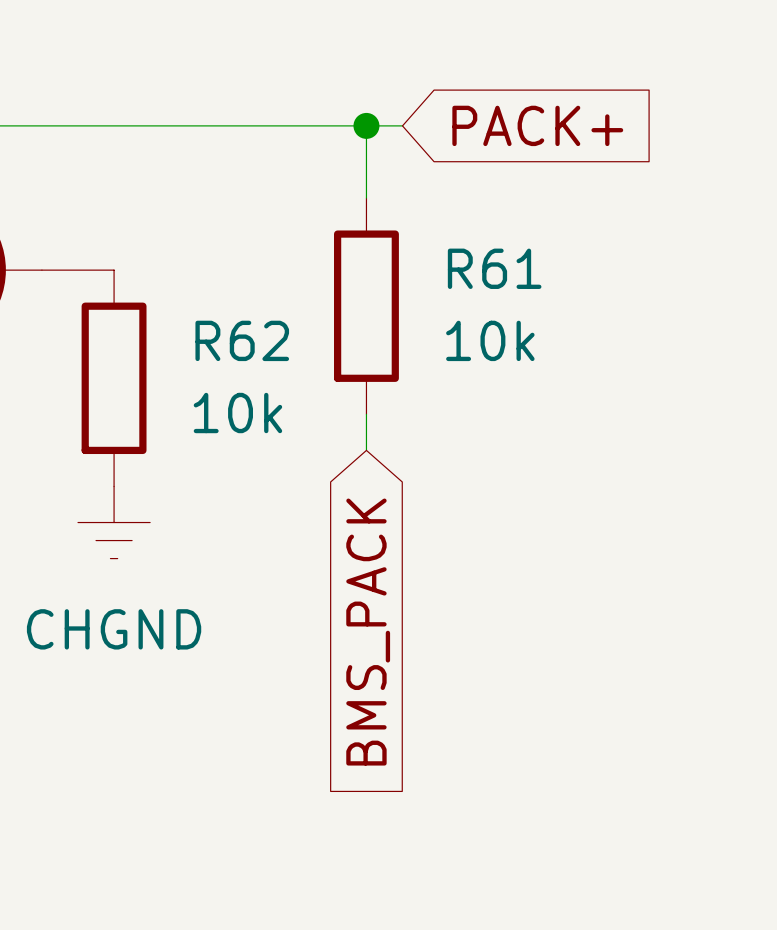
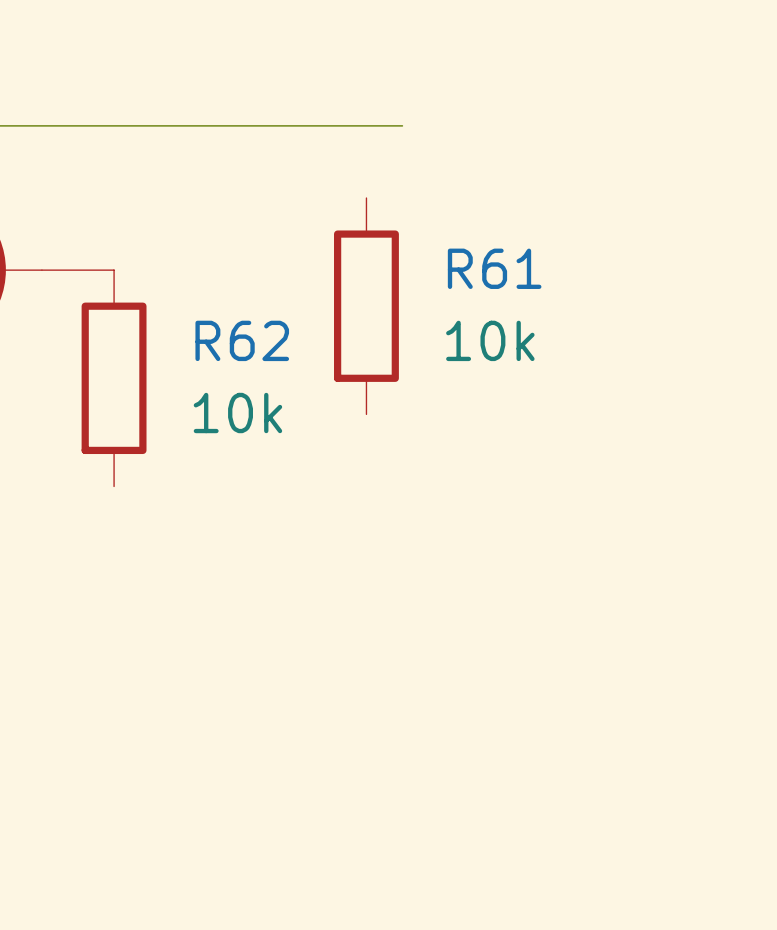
wire: (366, 125) (366, 198) -> none
junction: (366, 125) -> none
global label: PACK+ (537, 125) -> none
wire: (366, 414) (366, 450) -> none
power symbol: CHGND (114, 522) -> none
global label: BMS_PACK (368, 632) -> none

